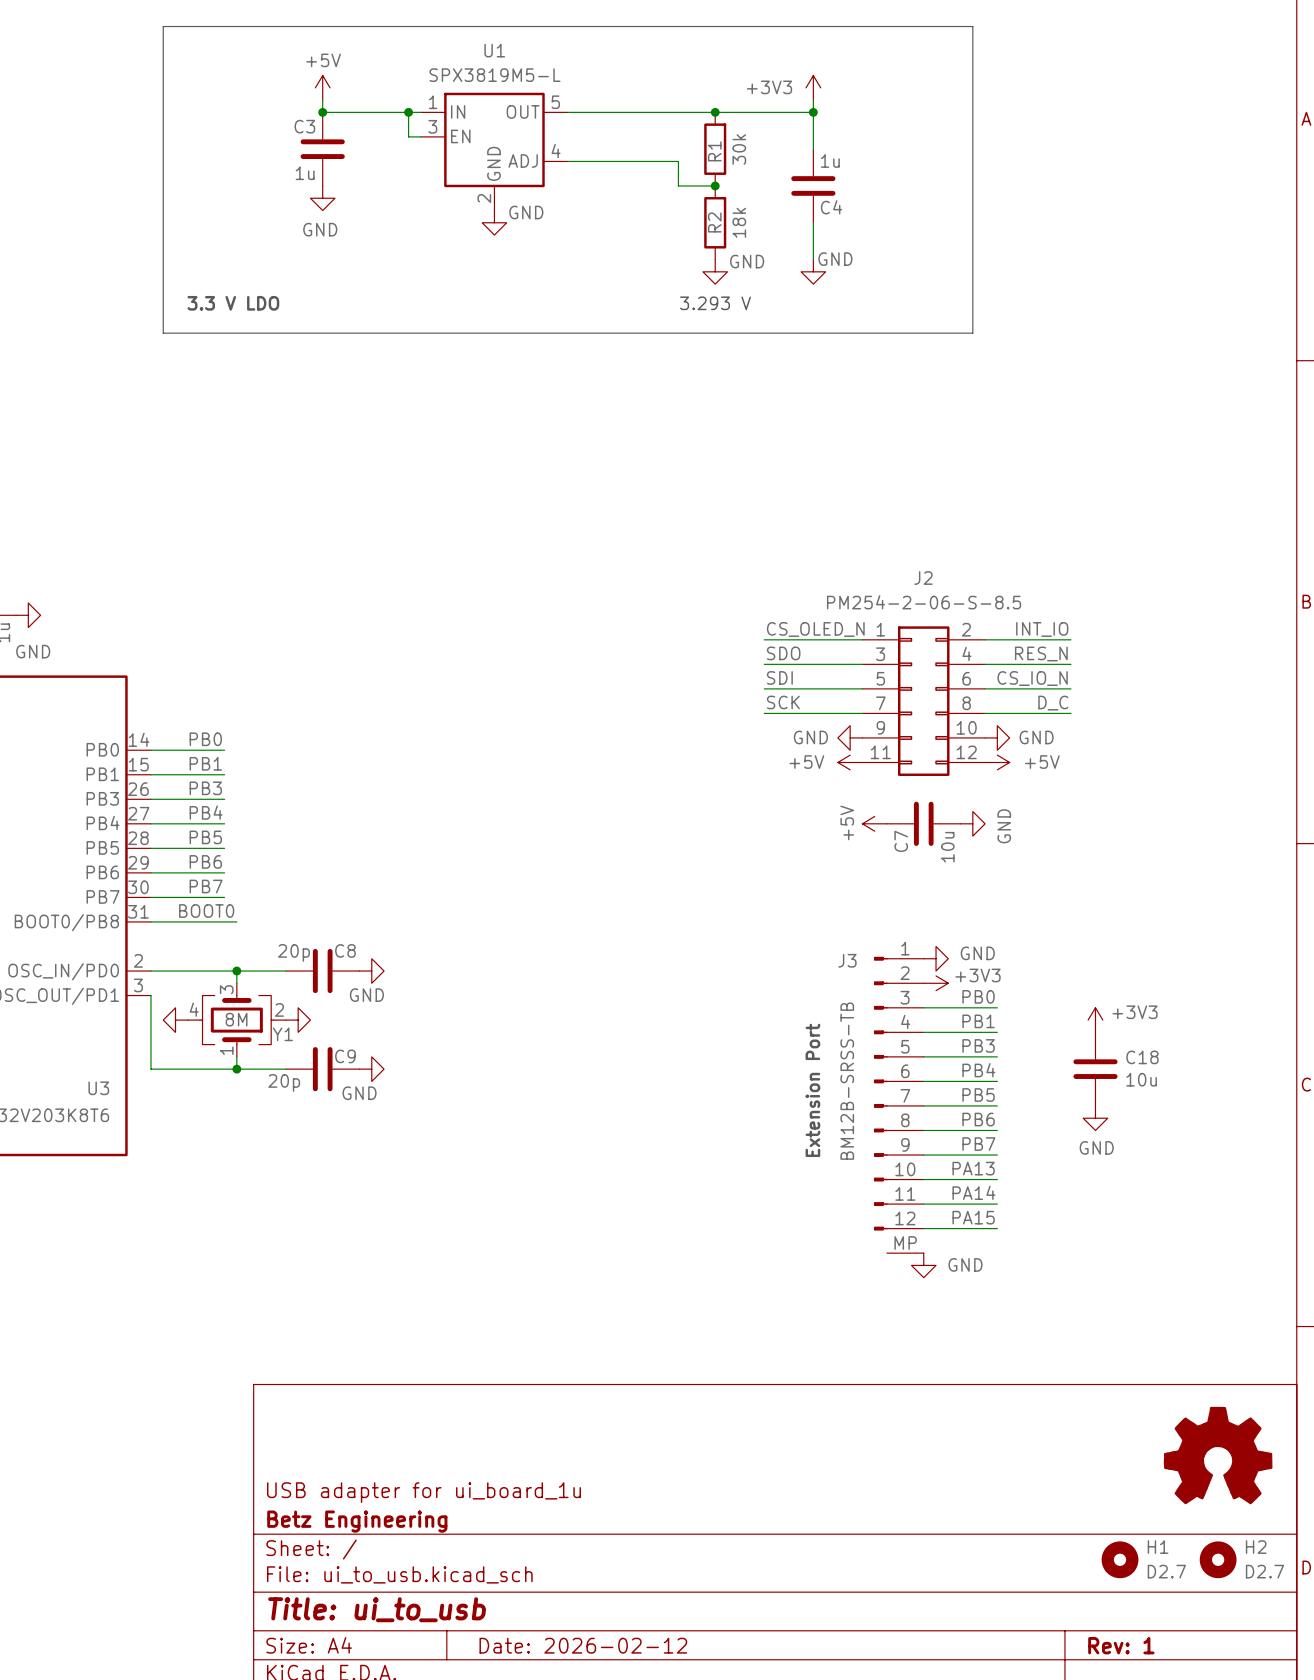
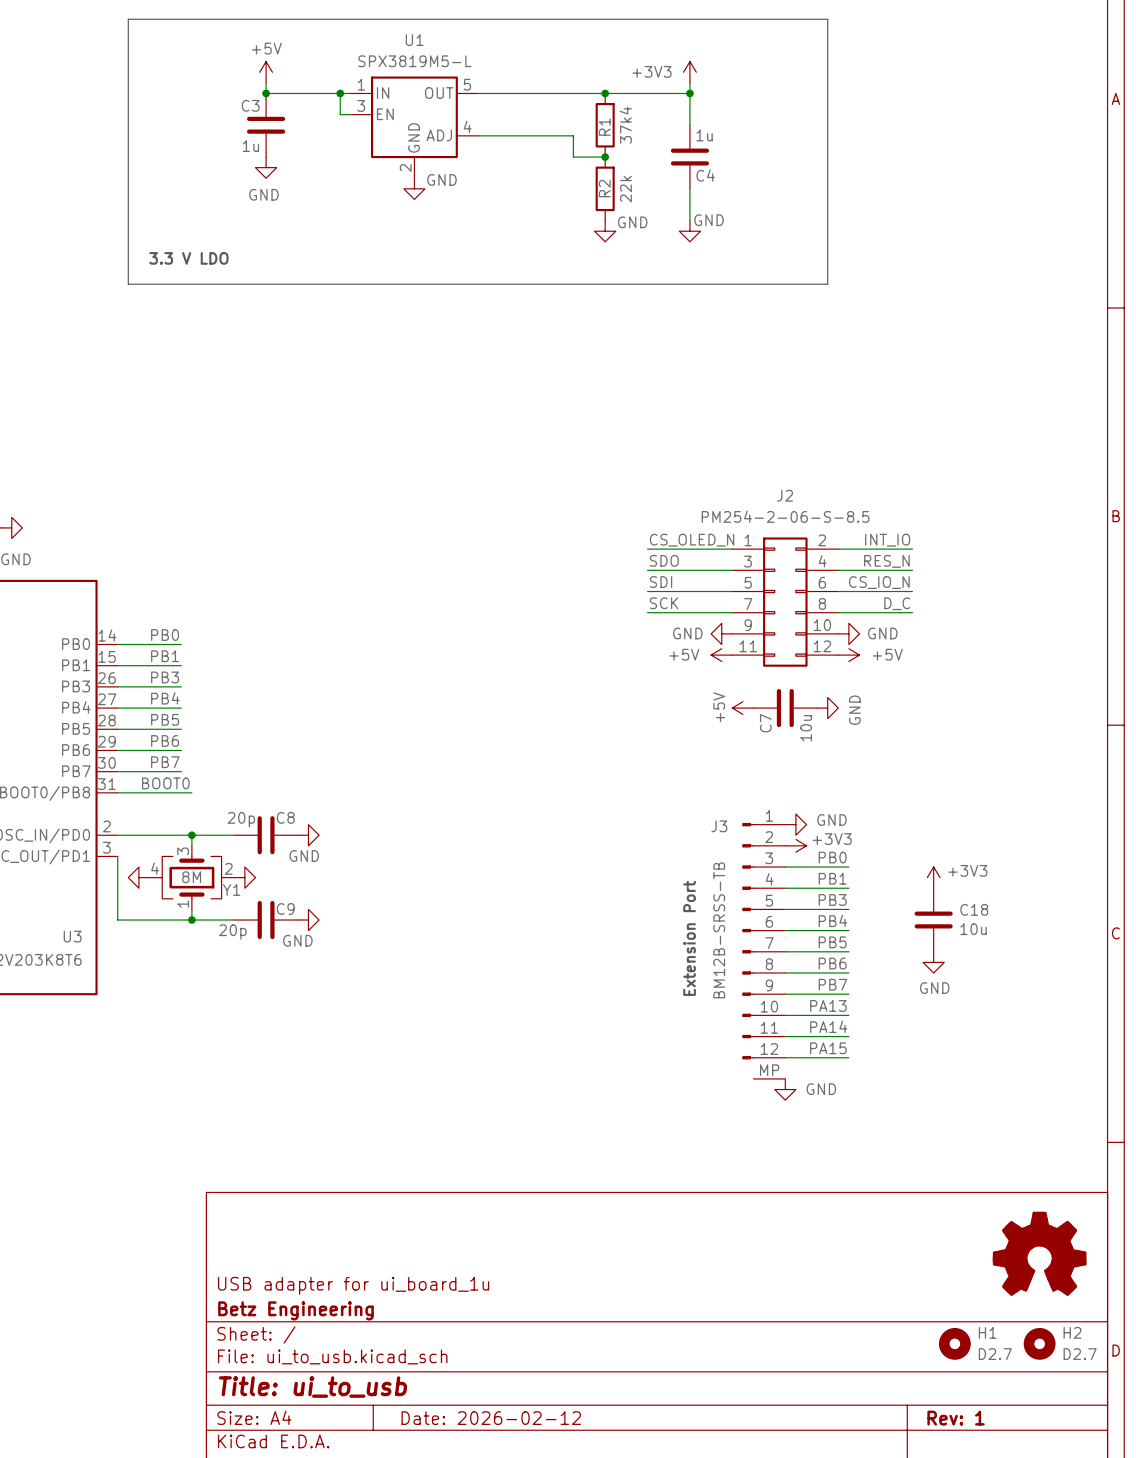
R1 value: 30k (739, 149) -> 37k4 (625, 125)
R2 value: 18k (739, 222) -> 22k (625, 189)
text: 3.293 V (715, 303) -> none

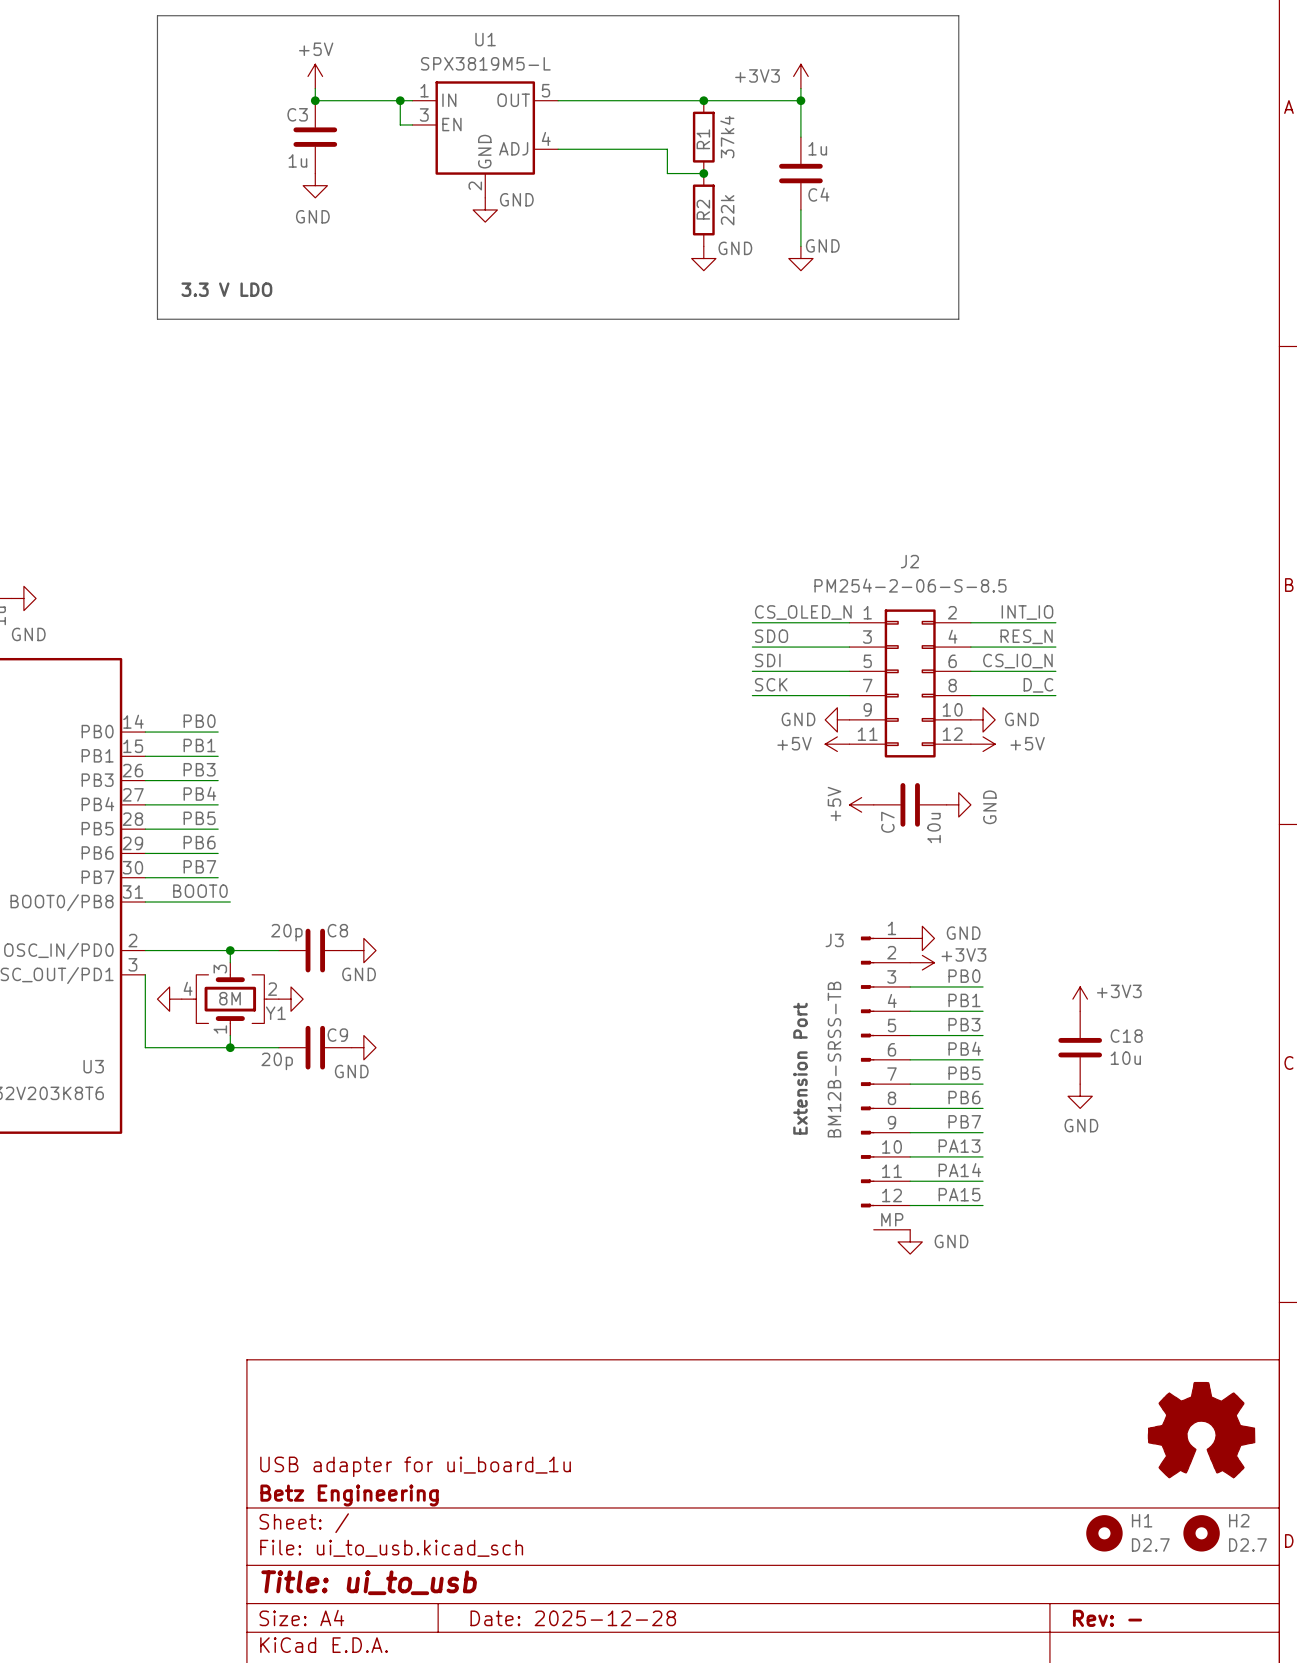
title block: Date: 2026-02-12 (491, 1418) -> Date: 2025-12-28 (573, 1618)
title block: Rev: 1 (956, 1418) -> Rev: - (1107, 1618)

